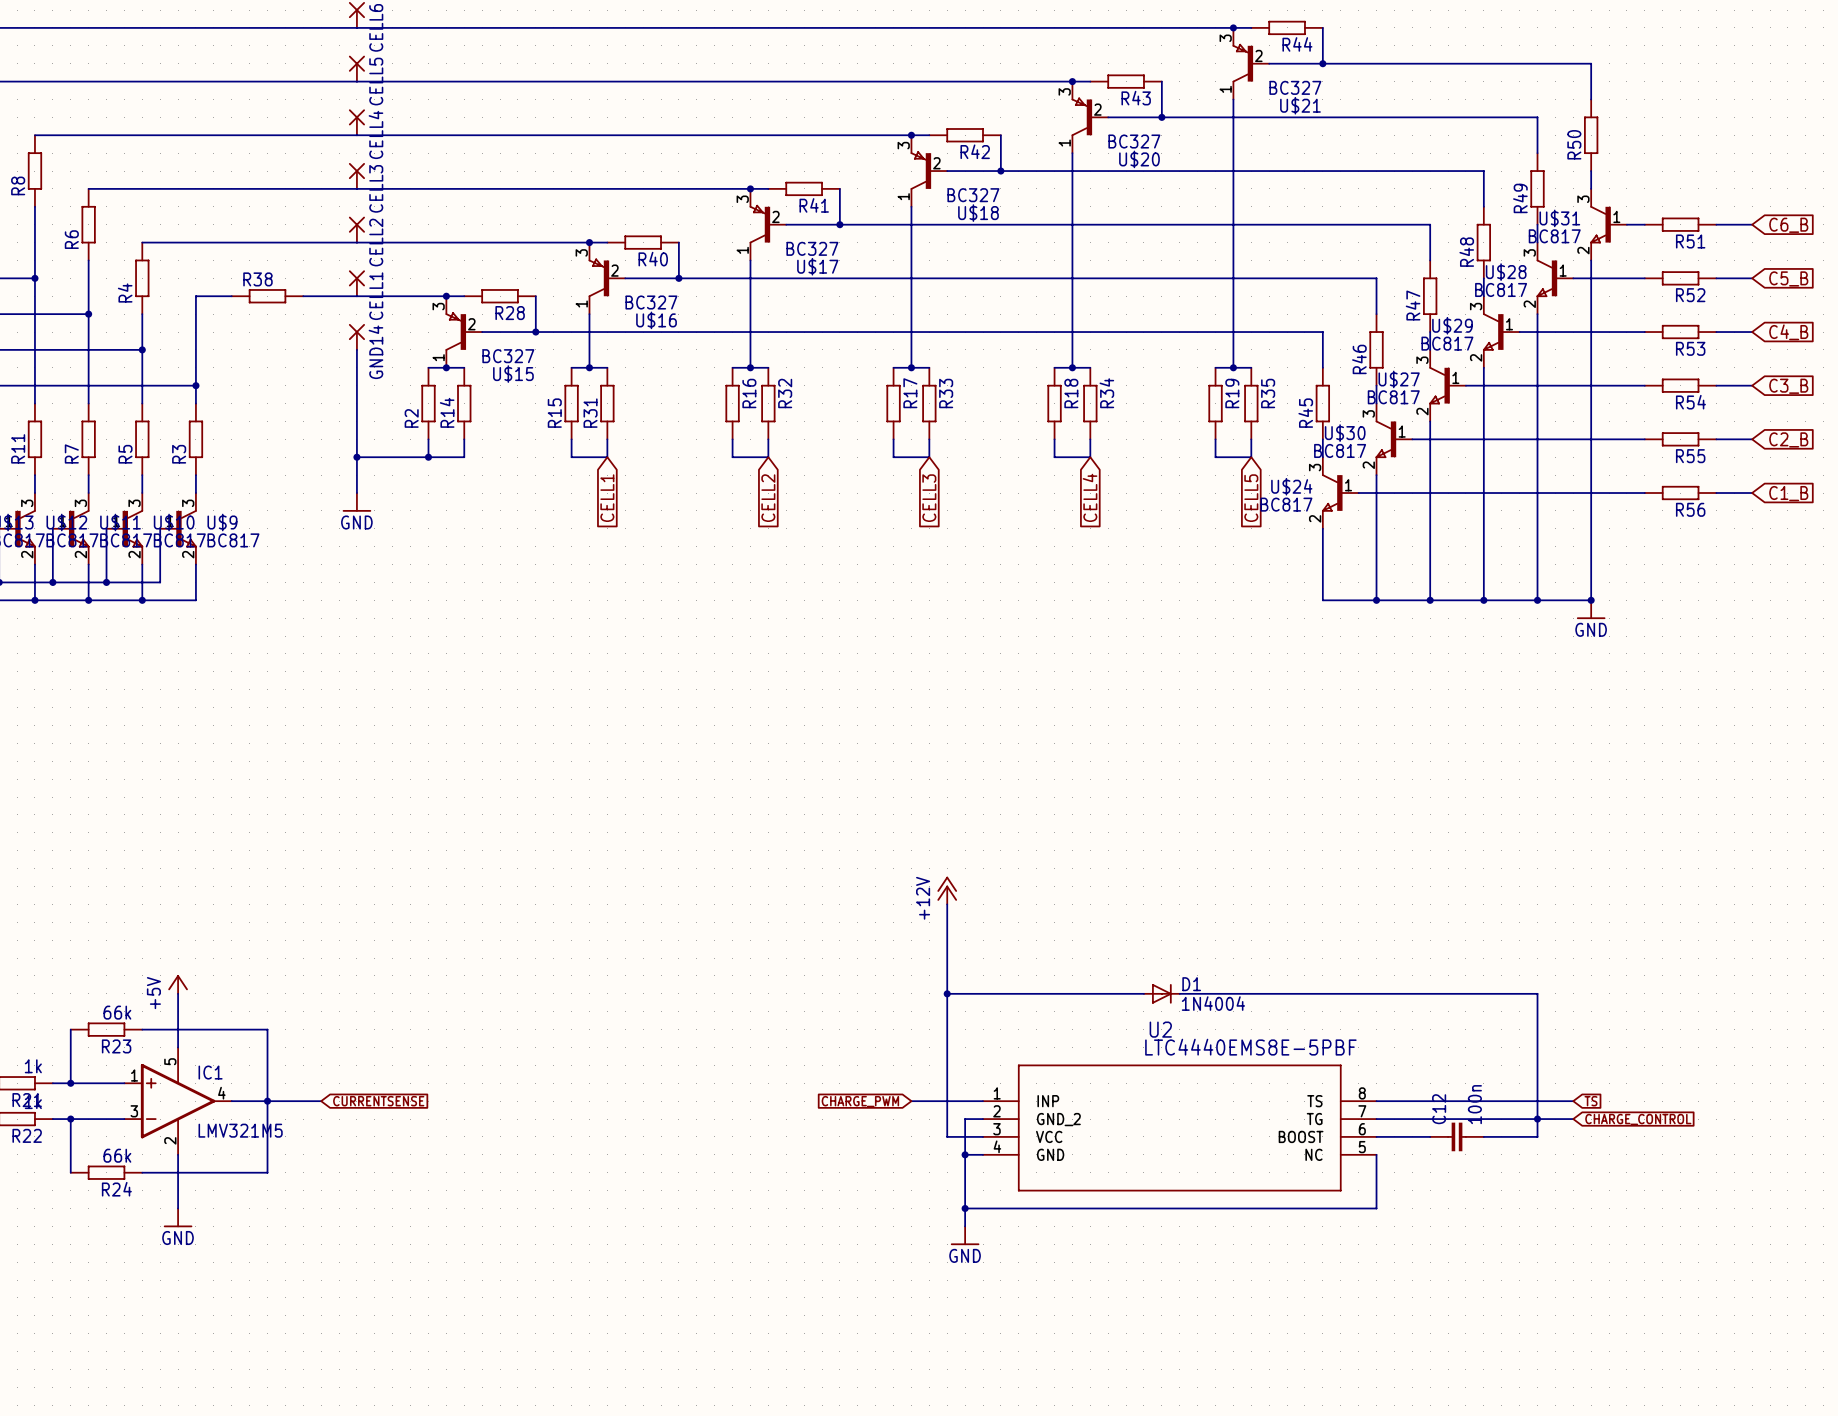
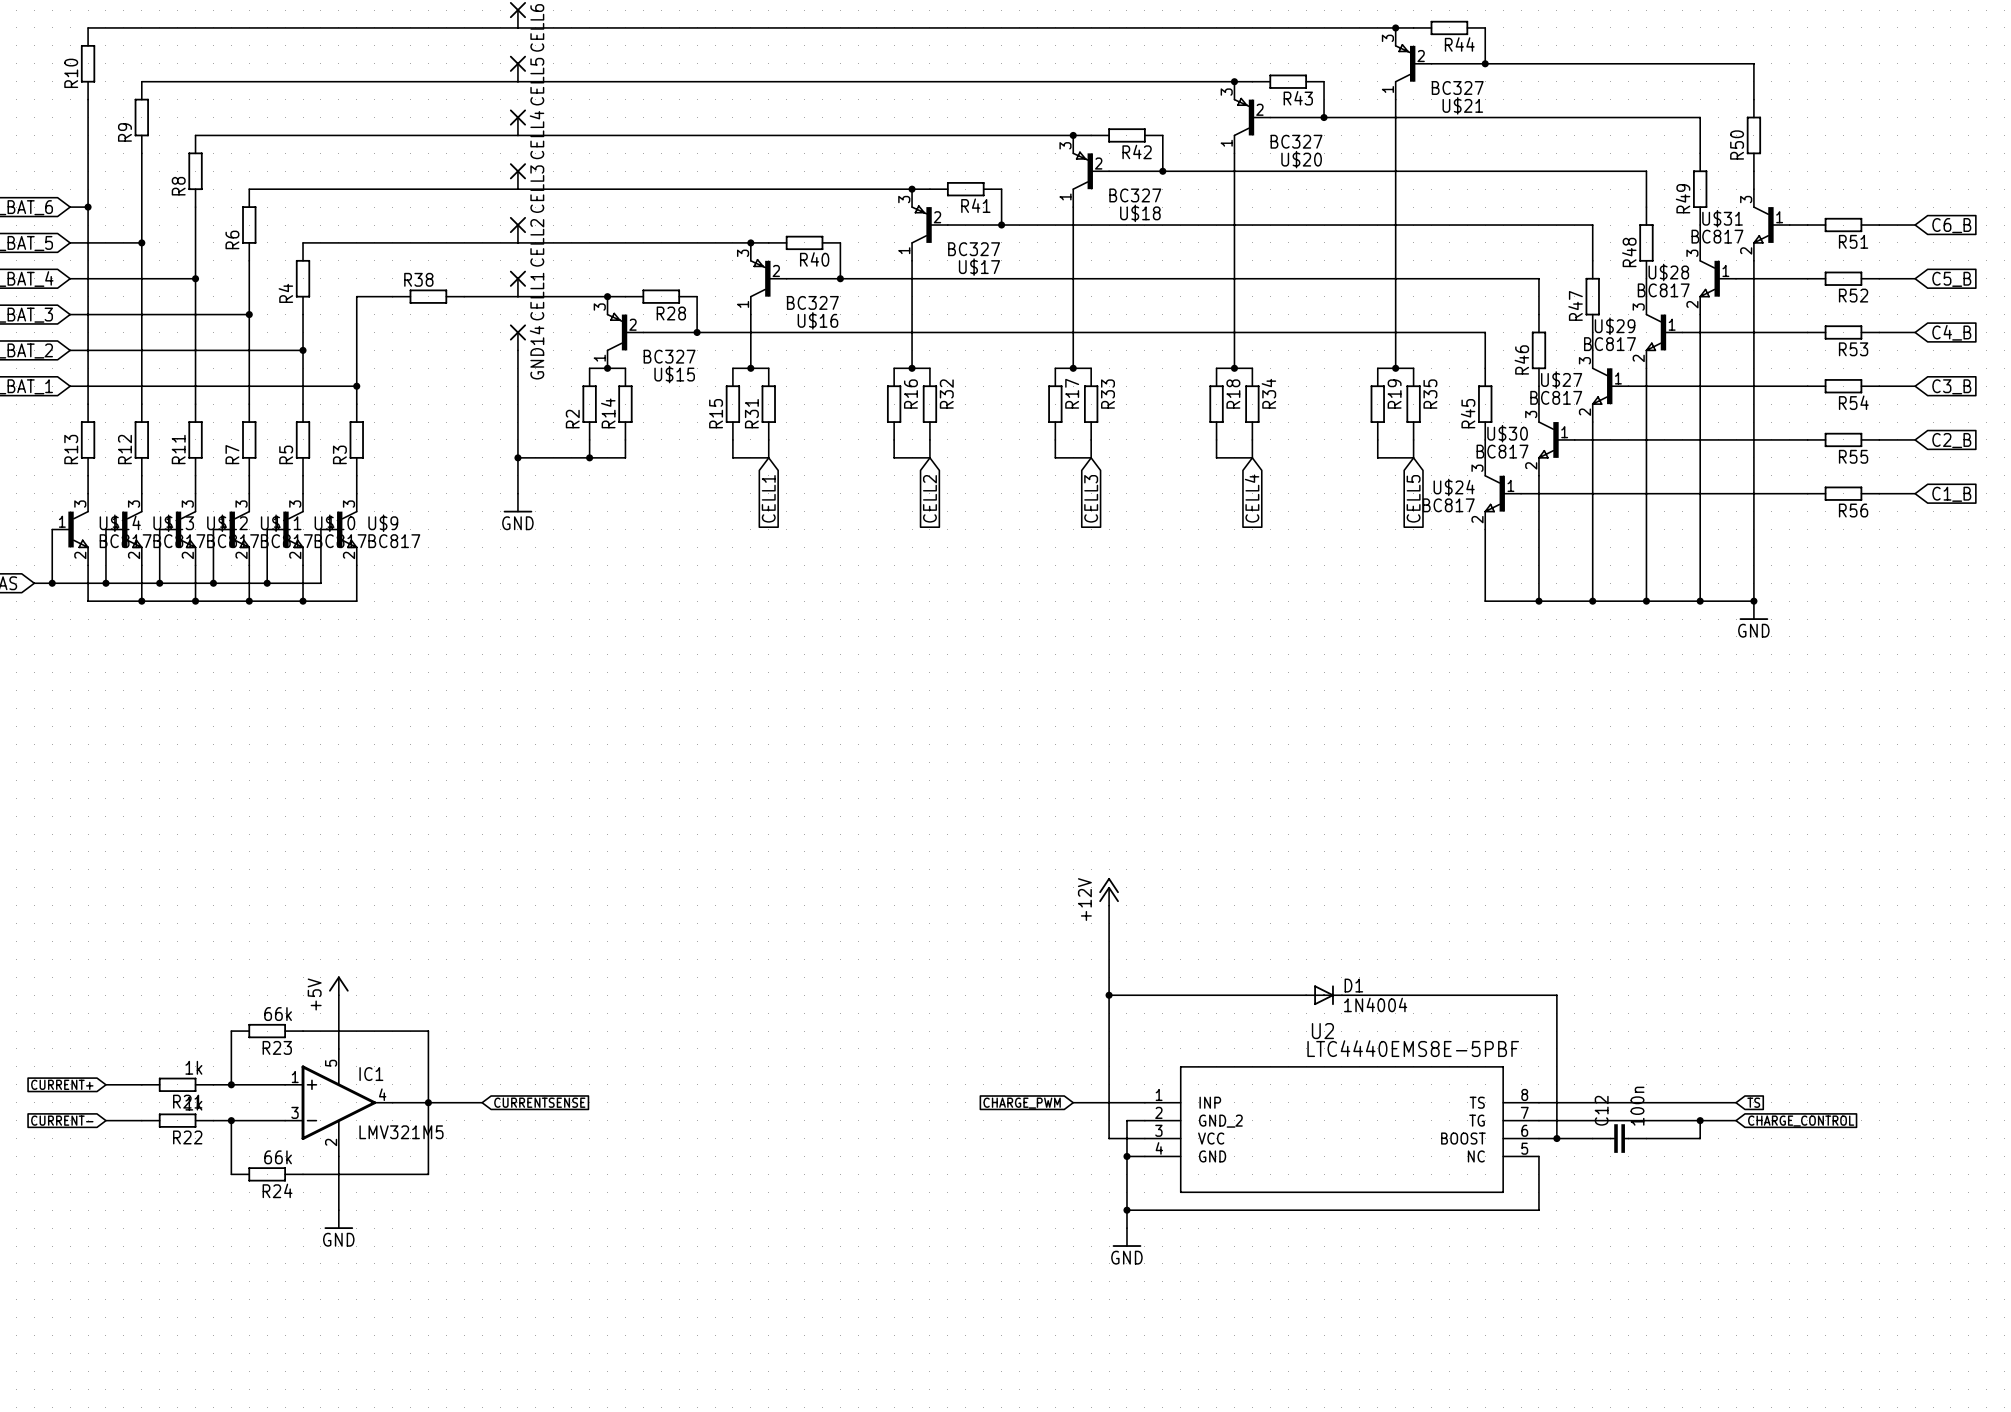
wire: (1394, 993) (1537, 993) (1537, 1119) -> (1556, 995) (1556, 1138)
junction: none -> (1556, 1138)

